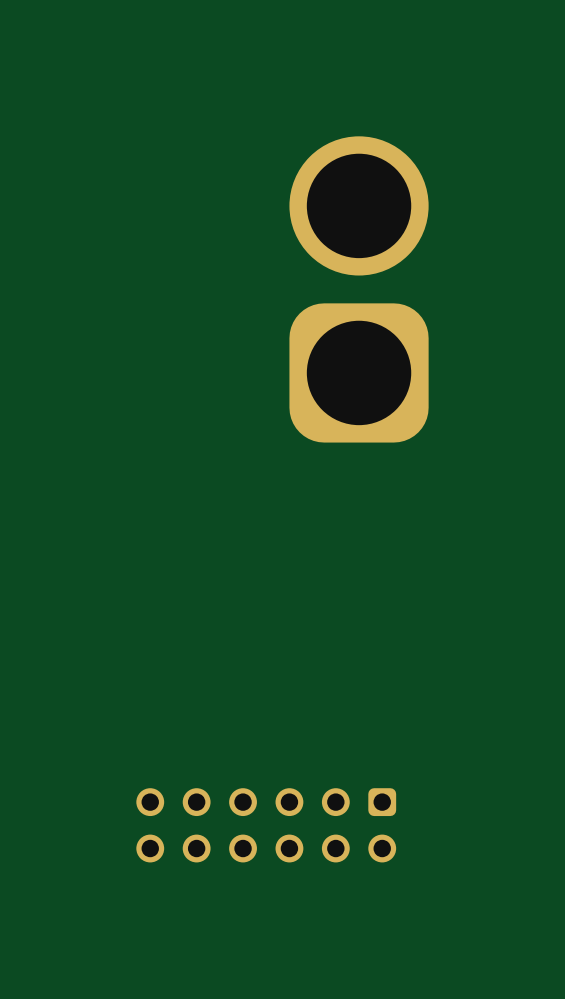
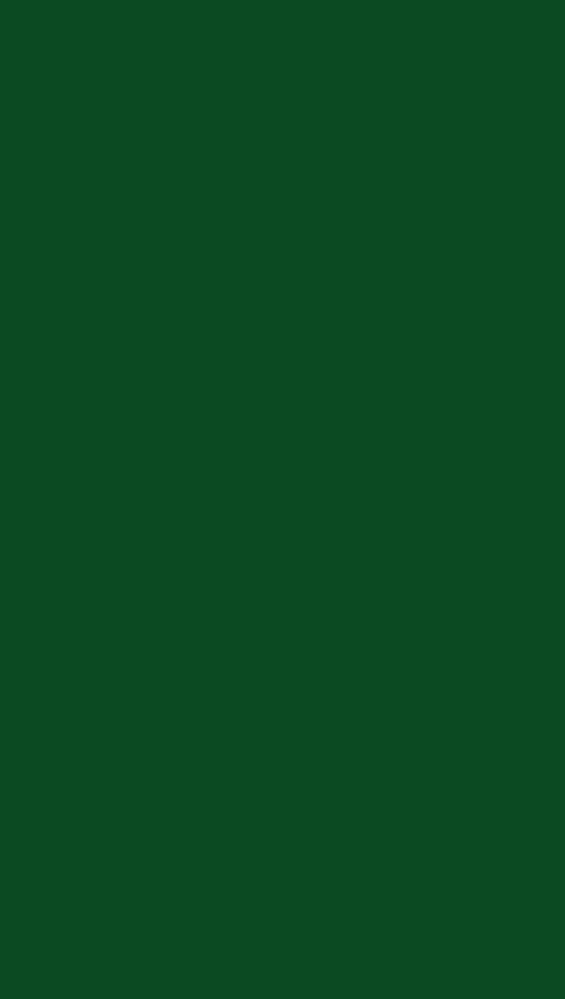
part: (359, 289) -> none
part: (266, 825) -> none

